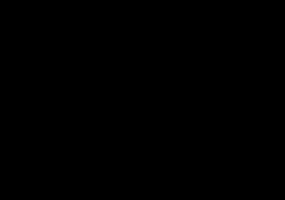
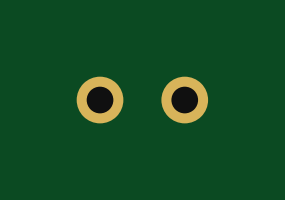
part: none -> (142, 100)

